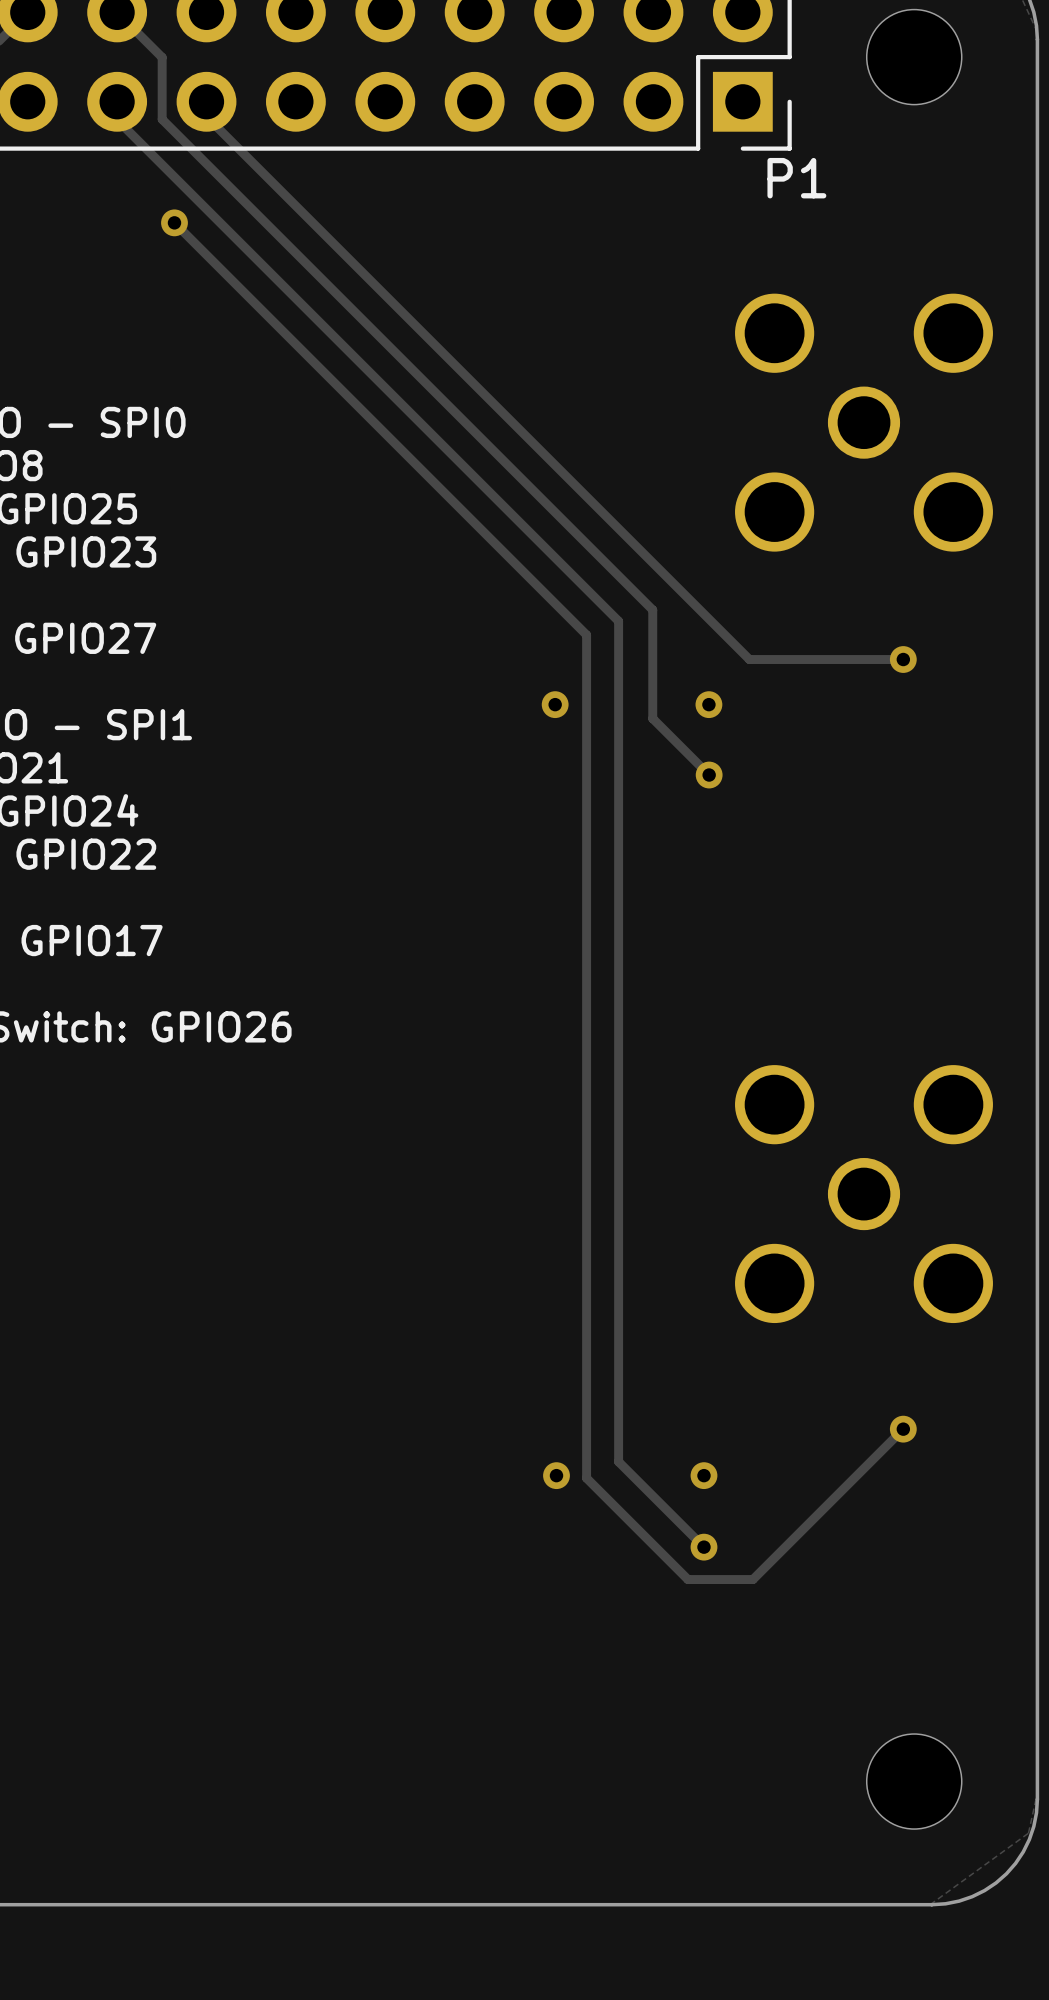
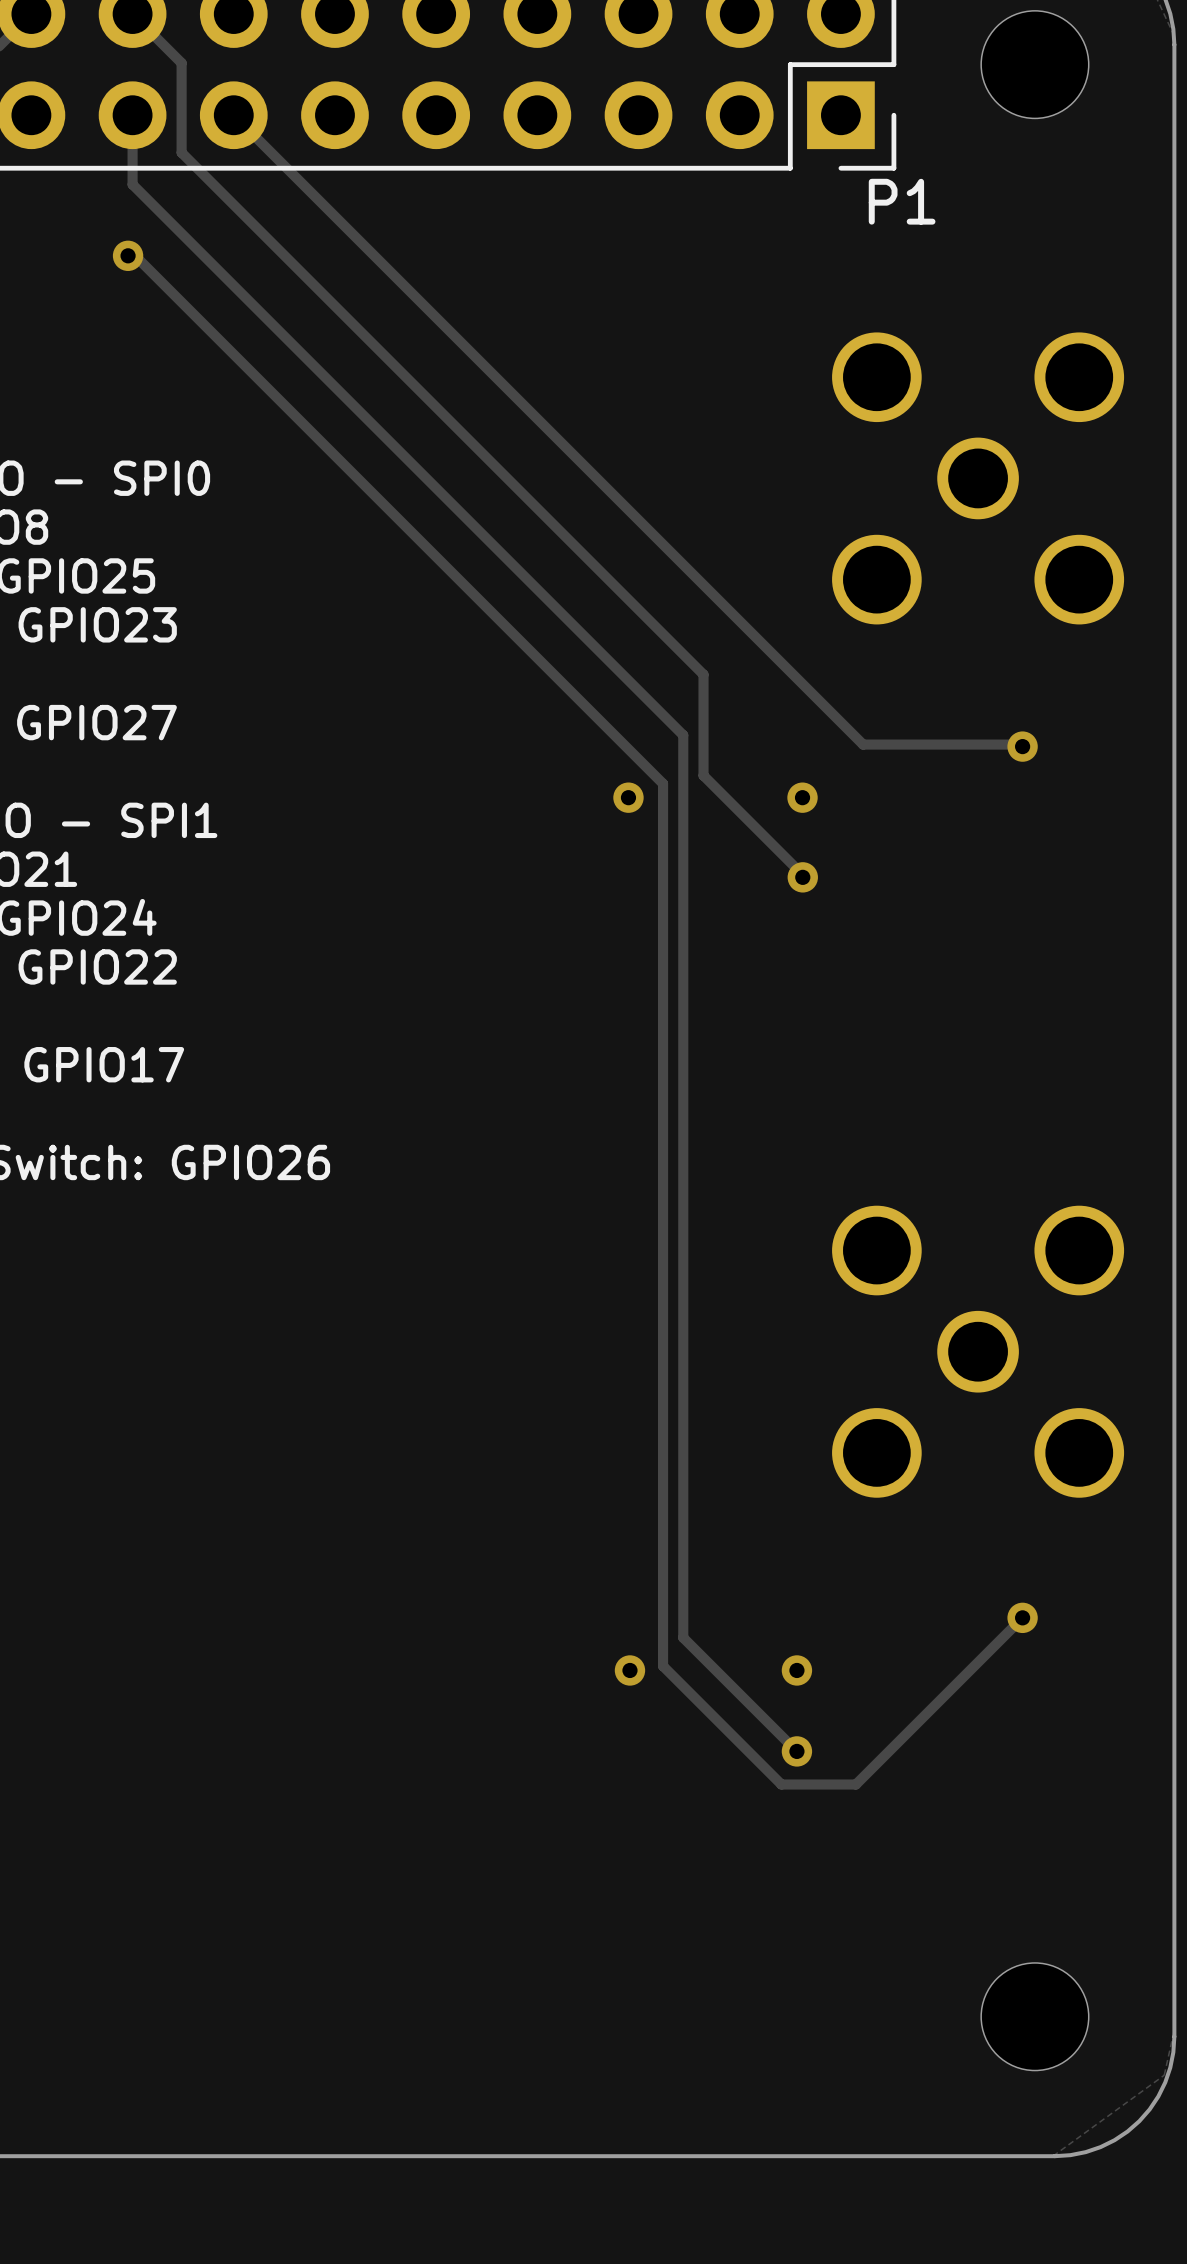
track: (160, 55) (162, 57) (162, 119) (652, 609) (652, 718) (709, 775) -> (181, 63) (181, 152) (703, 674) (703, 775) (804, 876)
track: none -> (233, 115) (863, 744) (1024, 744)
track: (206, 116) (749, 659) (903, 659) -> none
track: (117, 119) (618, 621) (618, 1461) -> (132, 115) (132, 184) (683, 735) (683, 1637) (700, 1654)
track: (174, 222) (586, 634) (586, 1478) (687, 1579) (752, 1579) (756, 1576) -> (128, 255) (135, 255) (663, 783) (663, 1666) (781, 1784) (855, 1784)
via position: (174, 222) -> (128, 255)

